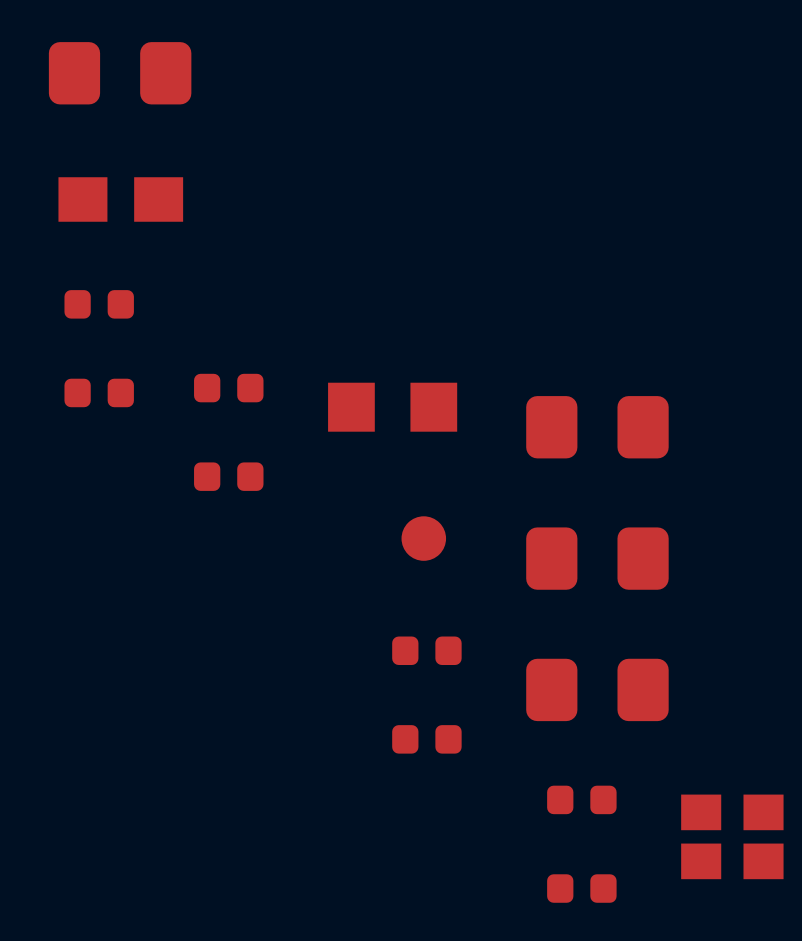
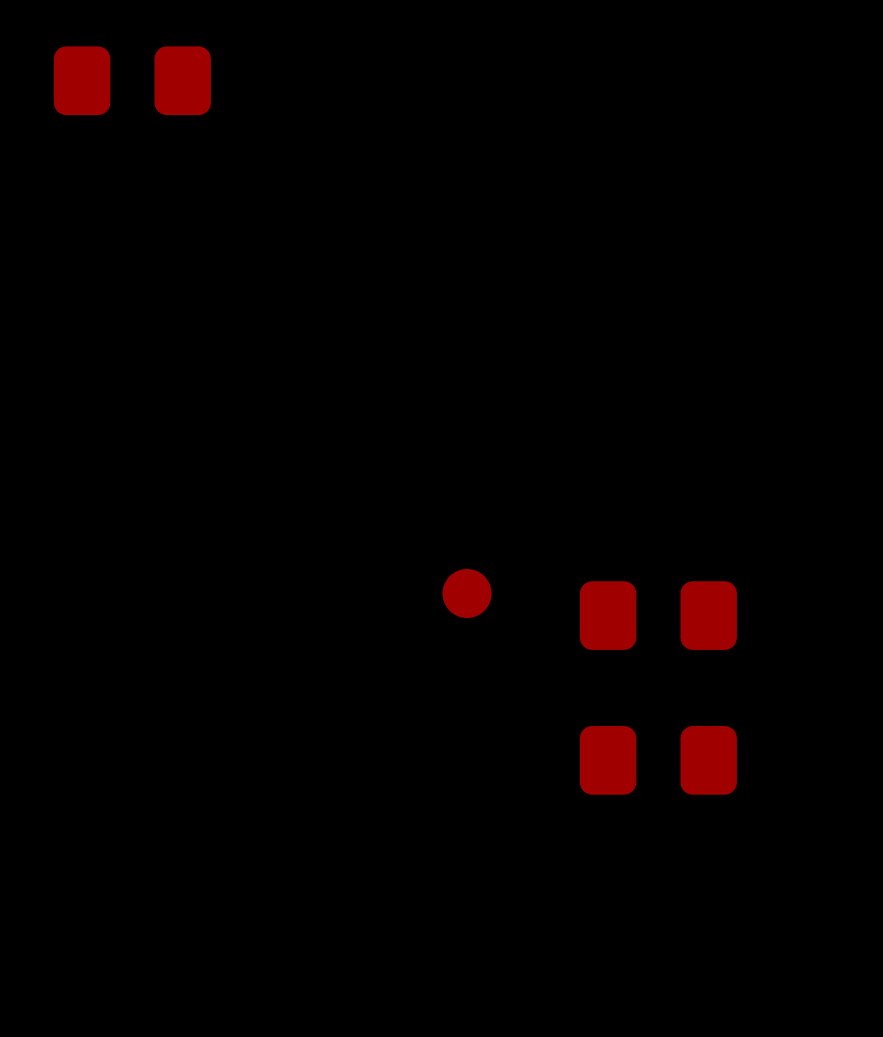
part: (120, 199) -> none
part: (99, 304) -> none
part: (228, 388) -> none
part: (99, 392) -> none
part: (392, 407) -> none
part: (597, 427) -> none
part: (228, 476) -> none
part: (426, 650) -> none
part: (426, 739) -> none
part: (581, 799) -> none
part: (732, 836) -> none
part: (581, 888) -> none

